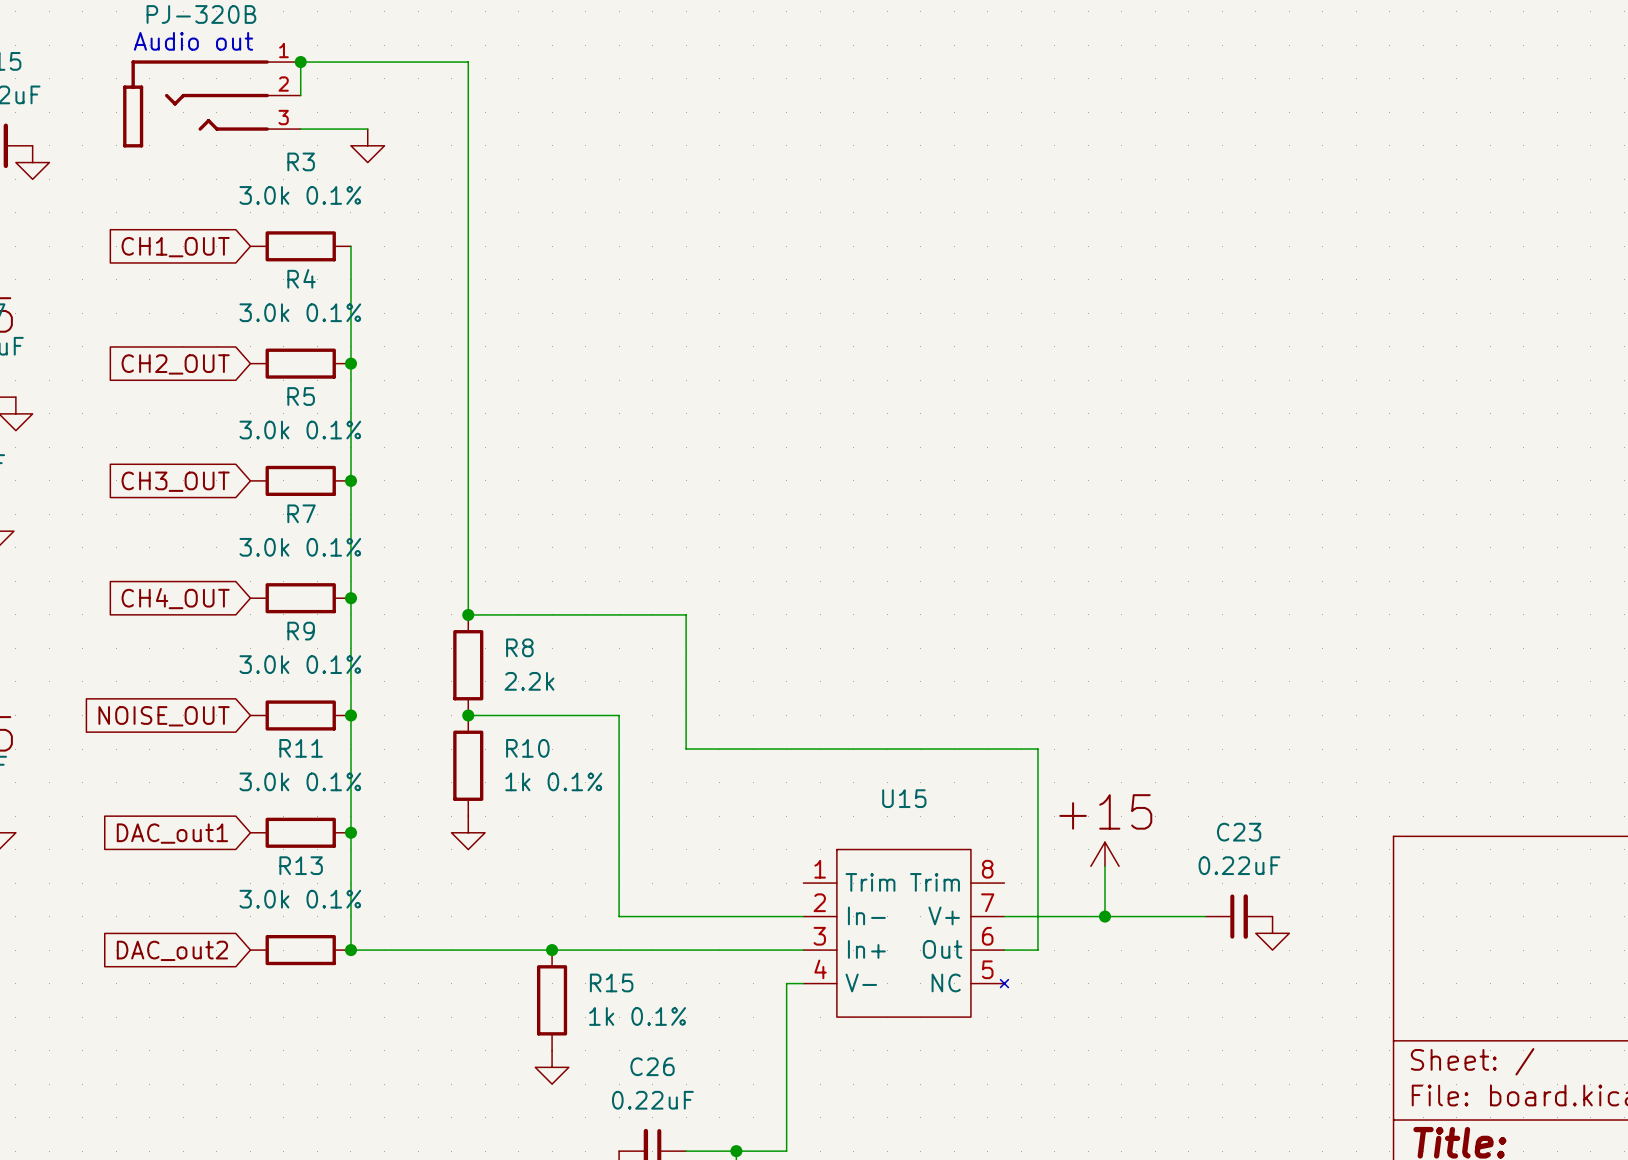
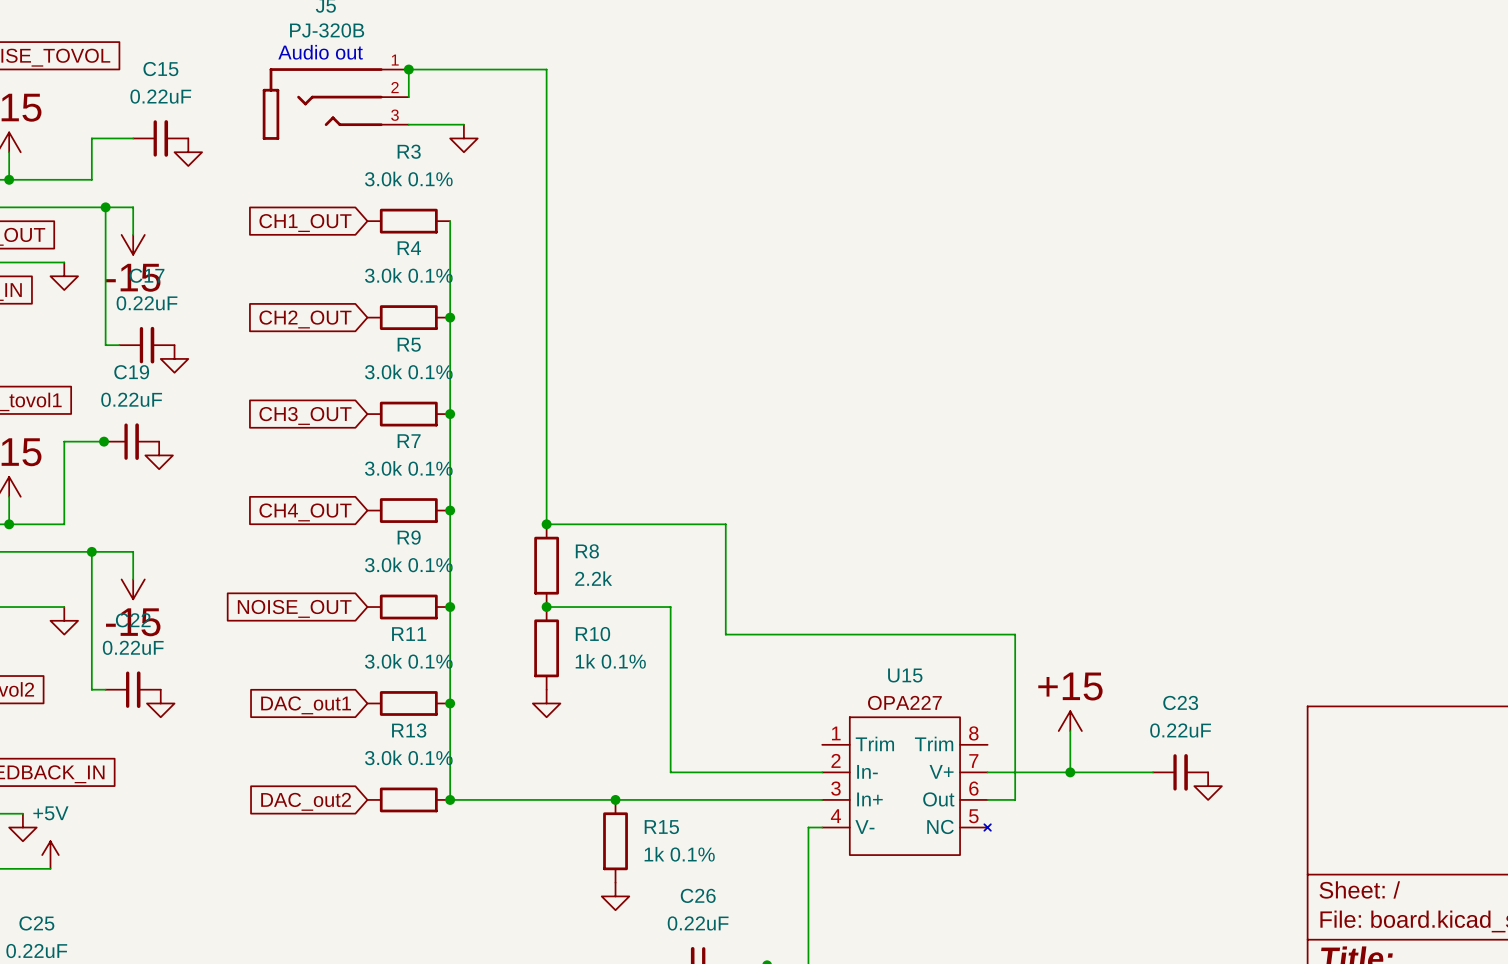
U15 text: none -> OPA227 (904, 702)

